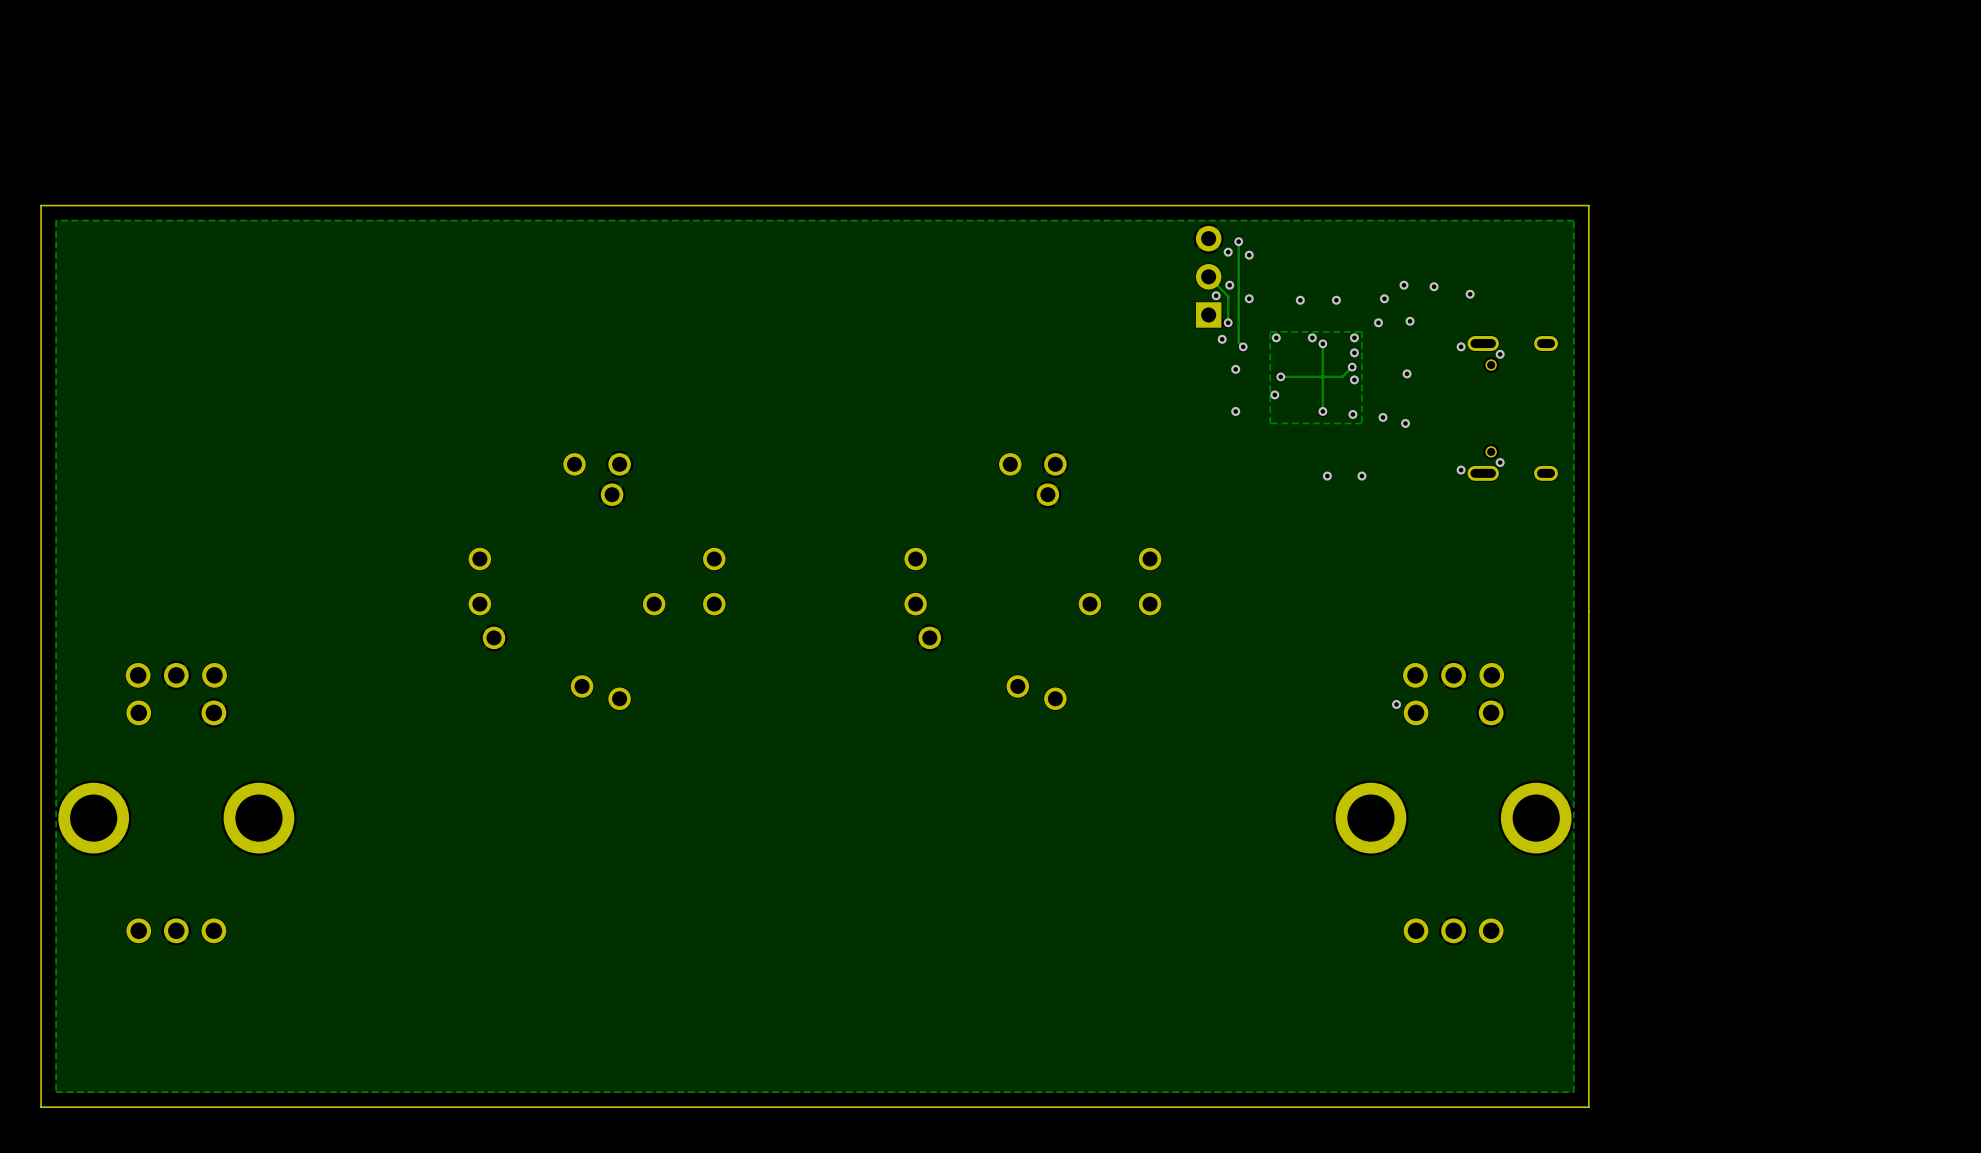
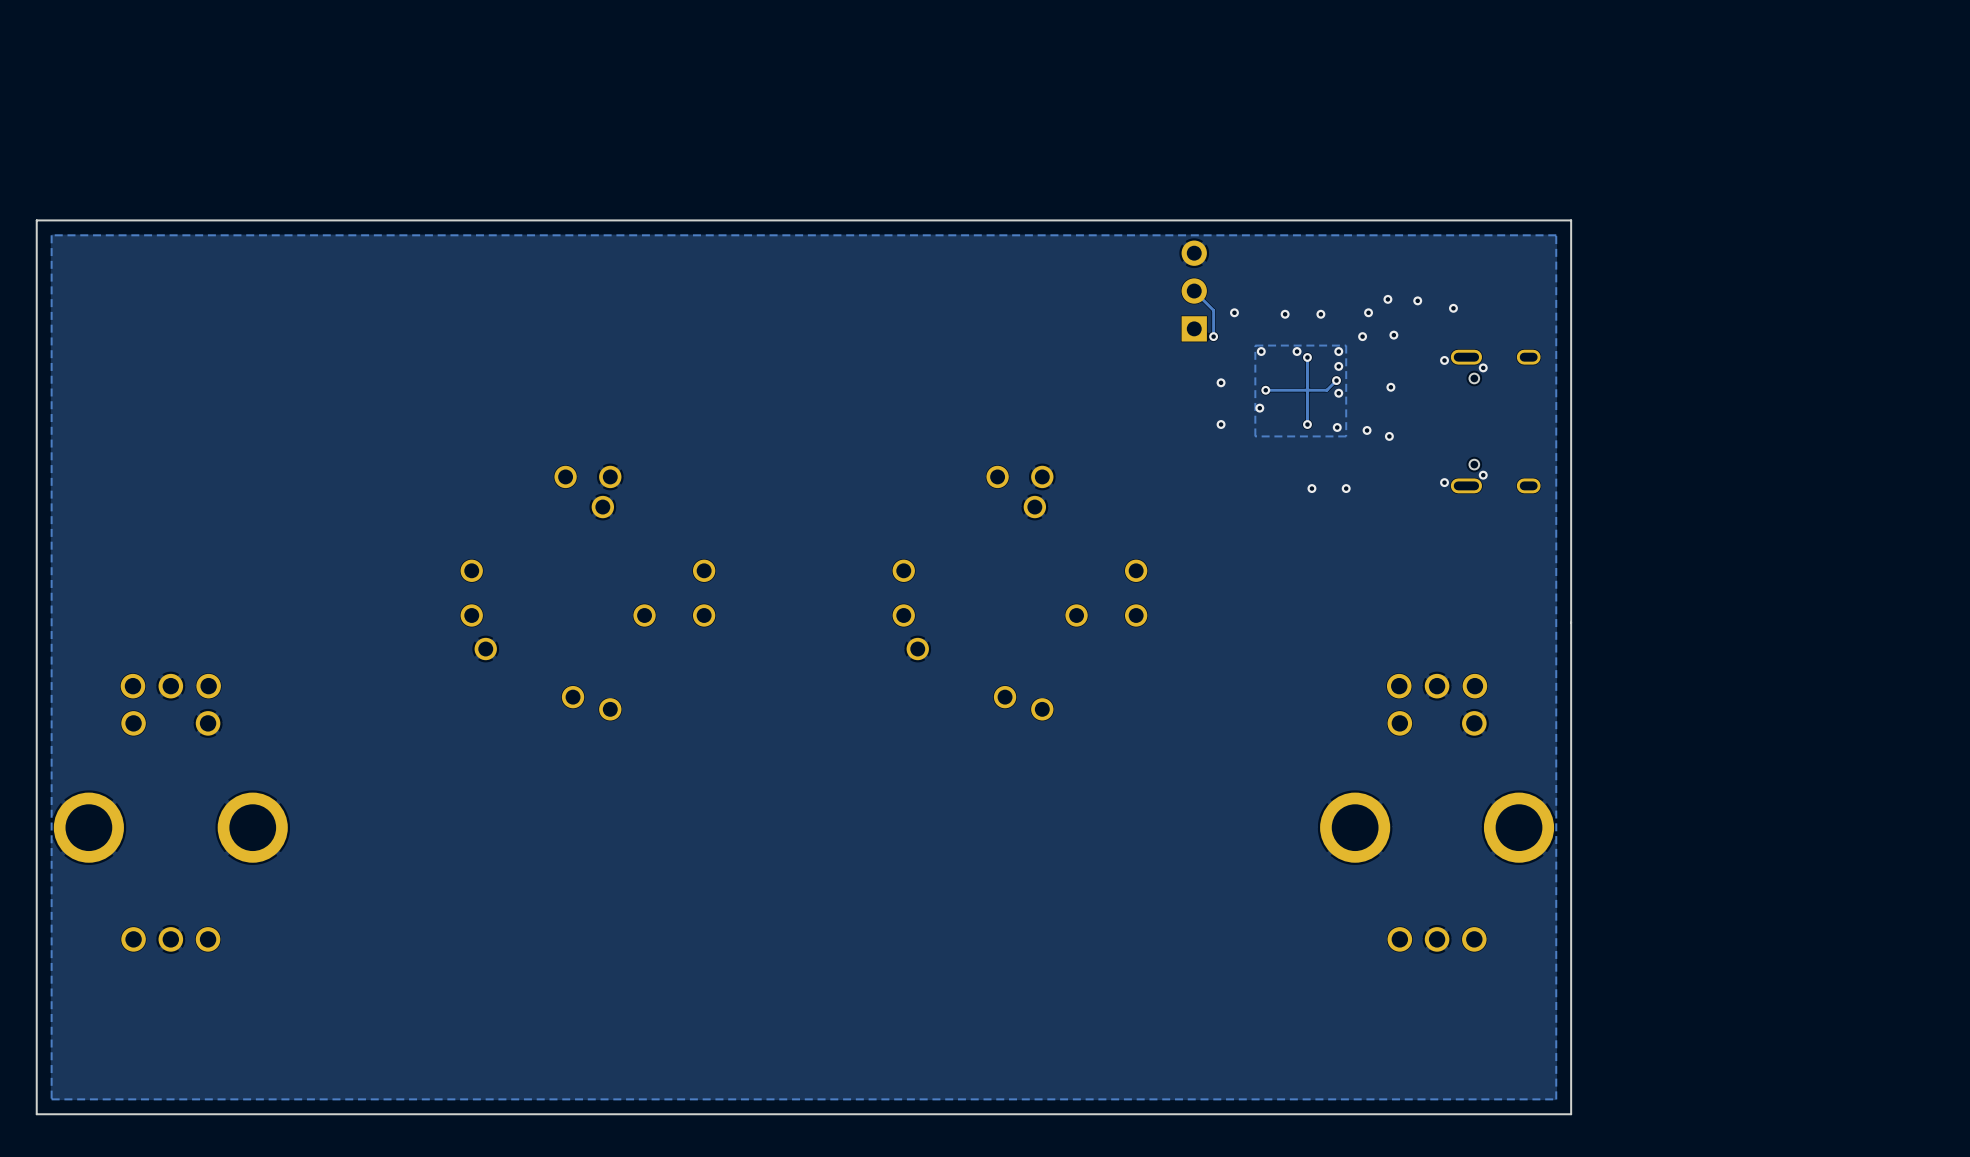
track: (1238, 241) (1238, 342) (1243, 346) -> none
via: (1238, 241) -> none
via: (1228, 252) -> none
via: (1249, 255) -> none
via: (1229, 285) -> none
via: (1216, 295) -> none
via: (1222, 339) -> none
via: (1243, 346) -> none
via: (1396, 704) -> none

